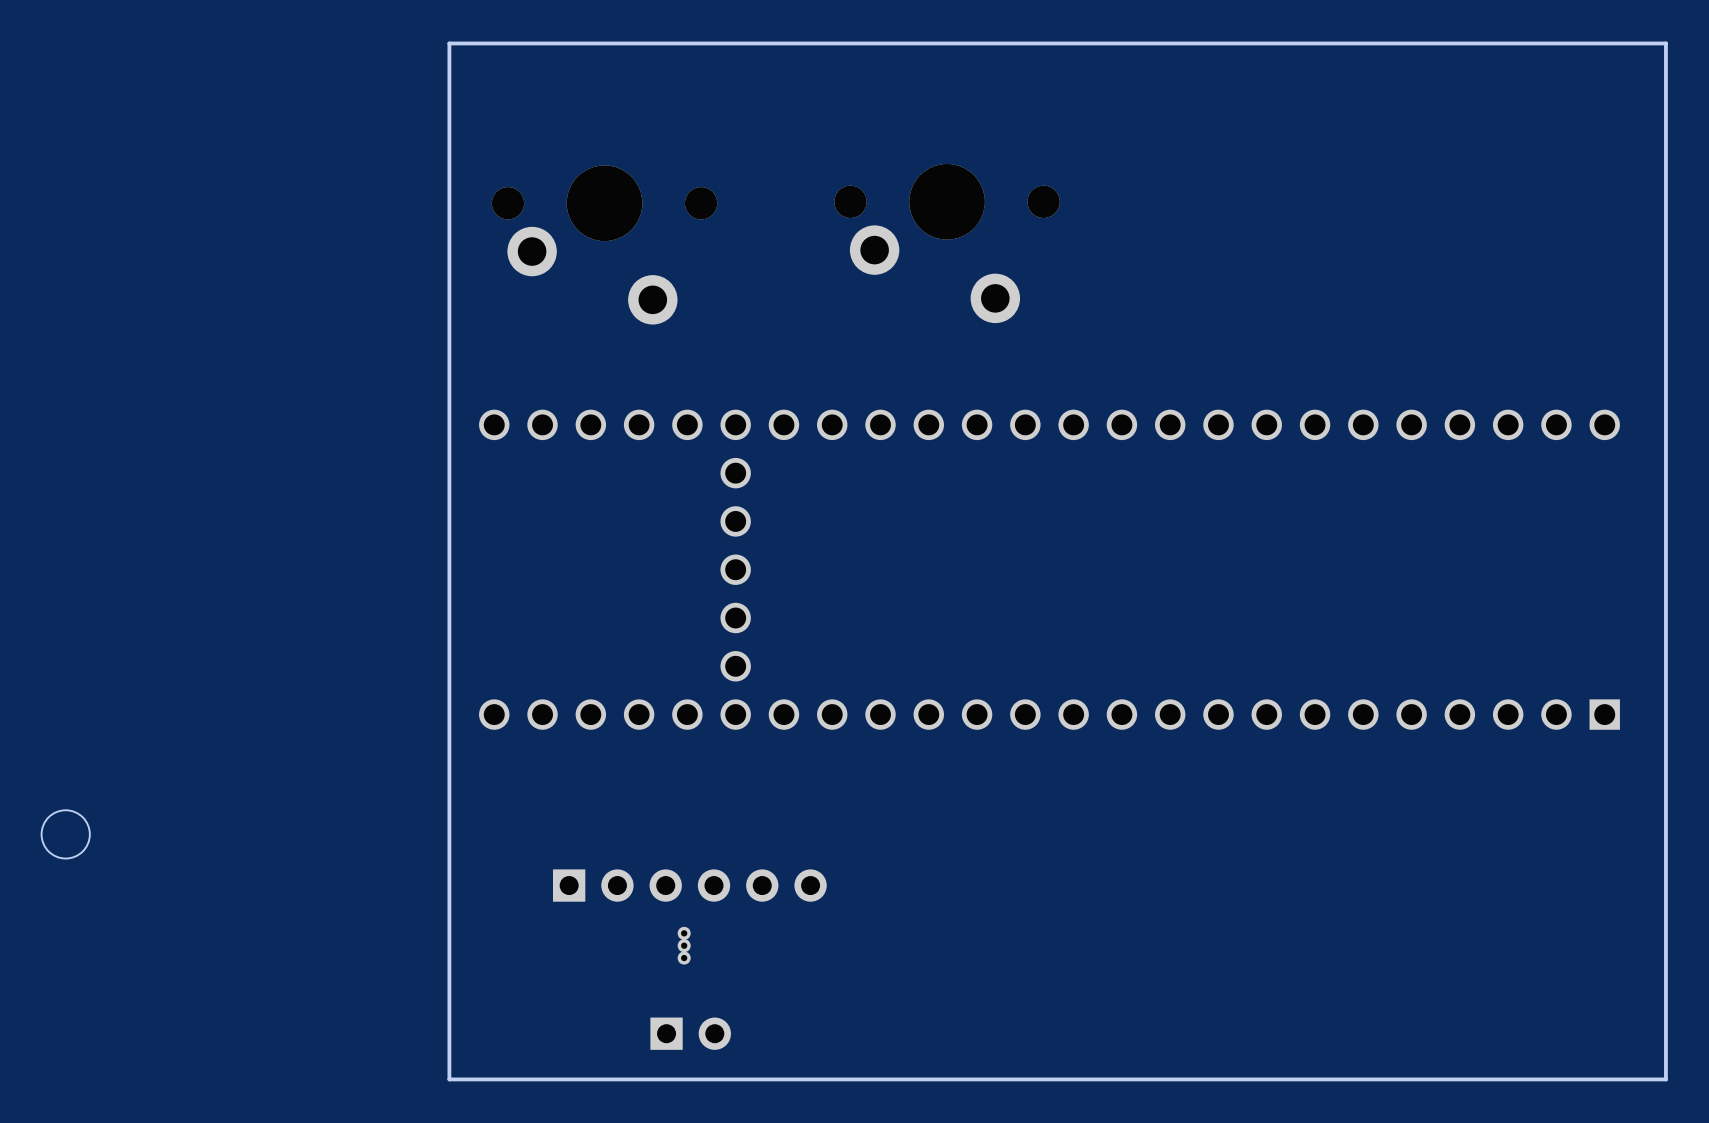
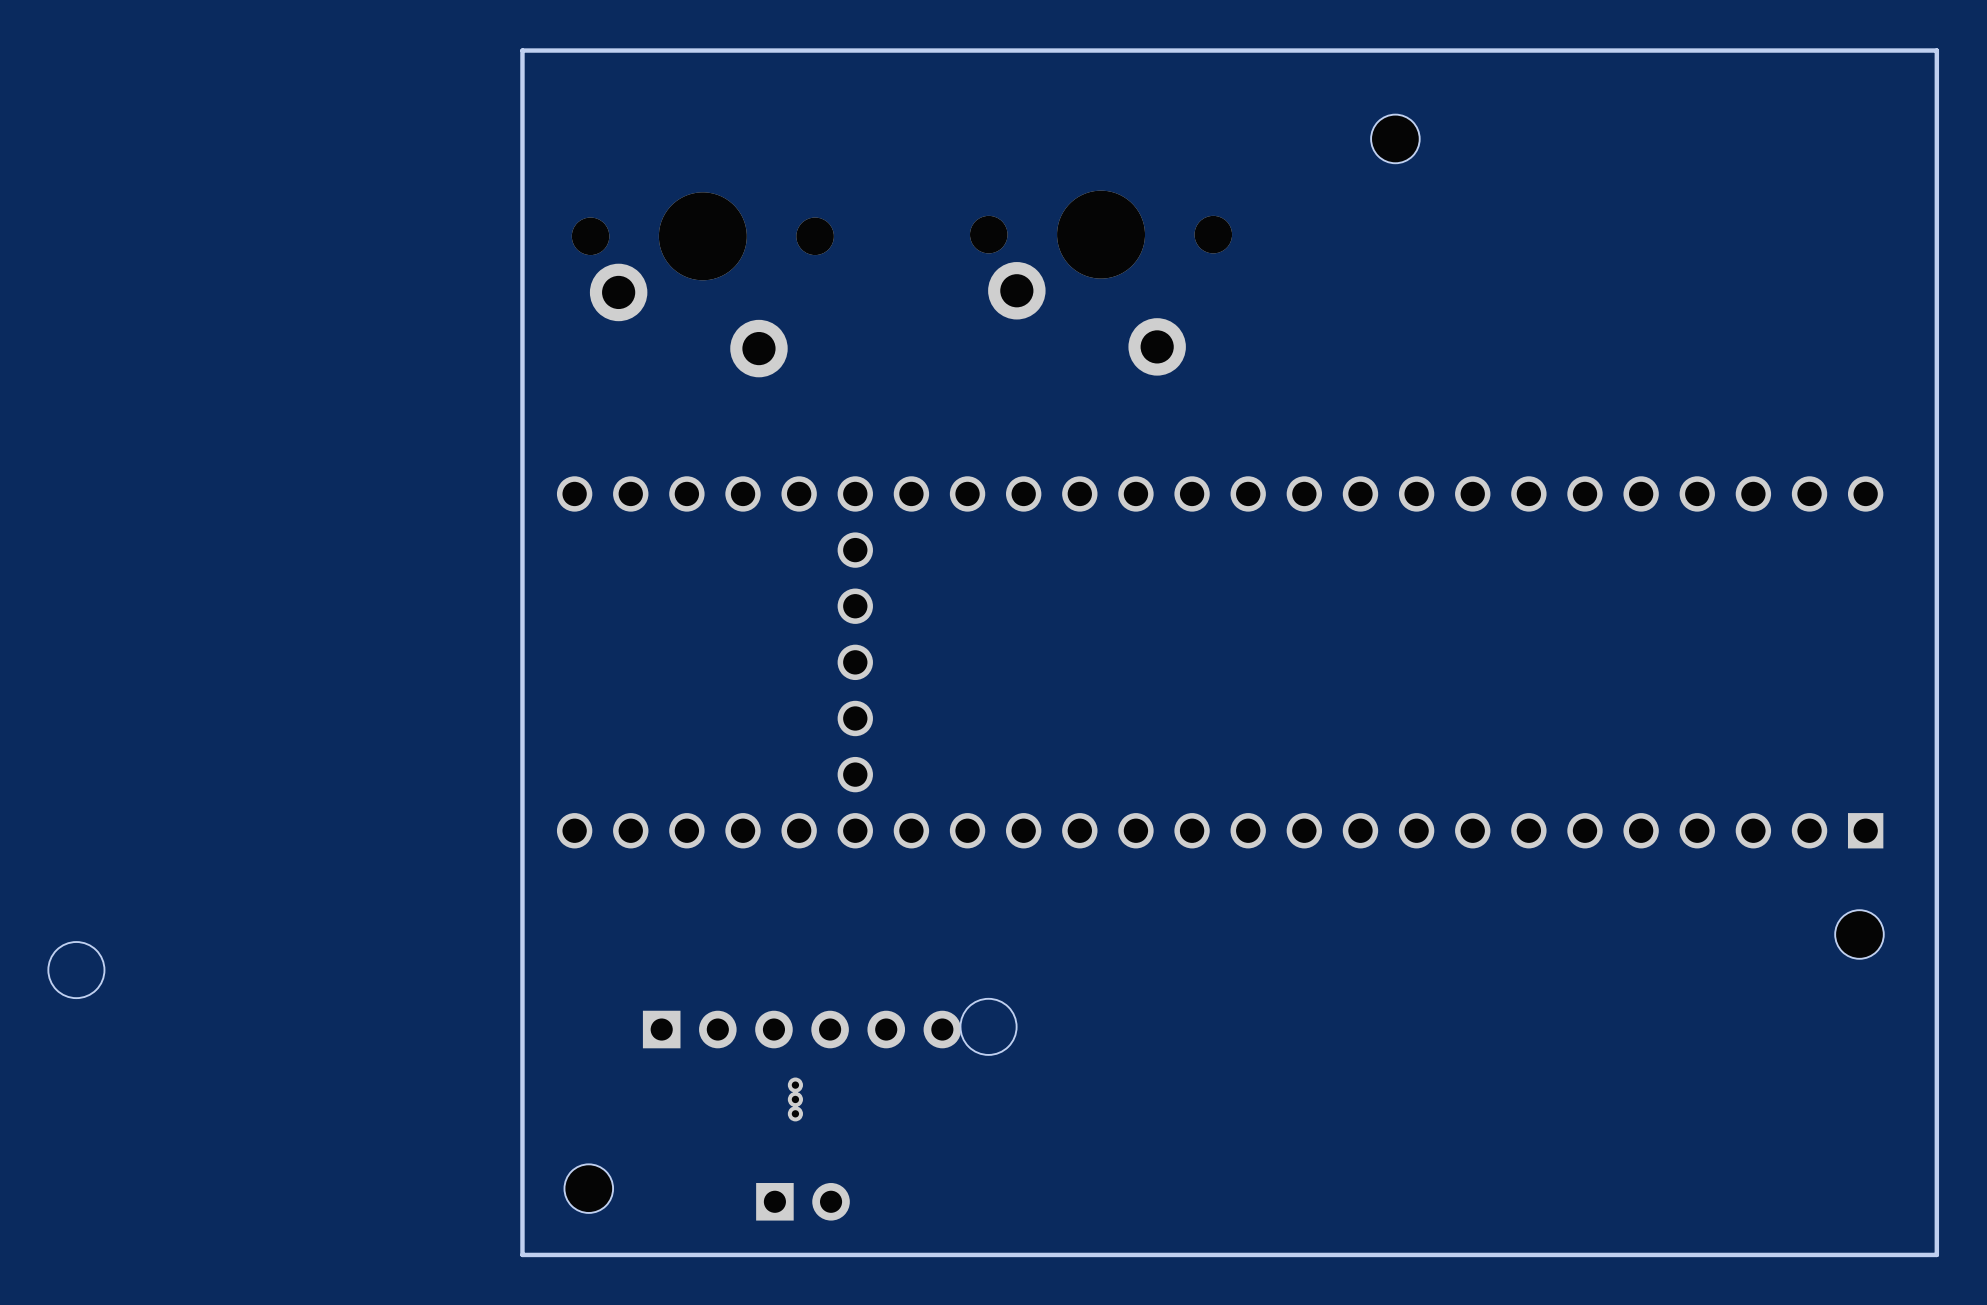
part: none -> (1395, 138)
part: none -> (1859, 934)
round board edge: none -> [960, 998, 1017, 1055]
part: none -> (588, 1188)

